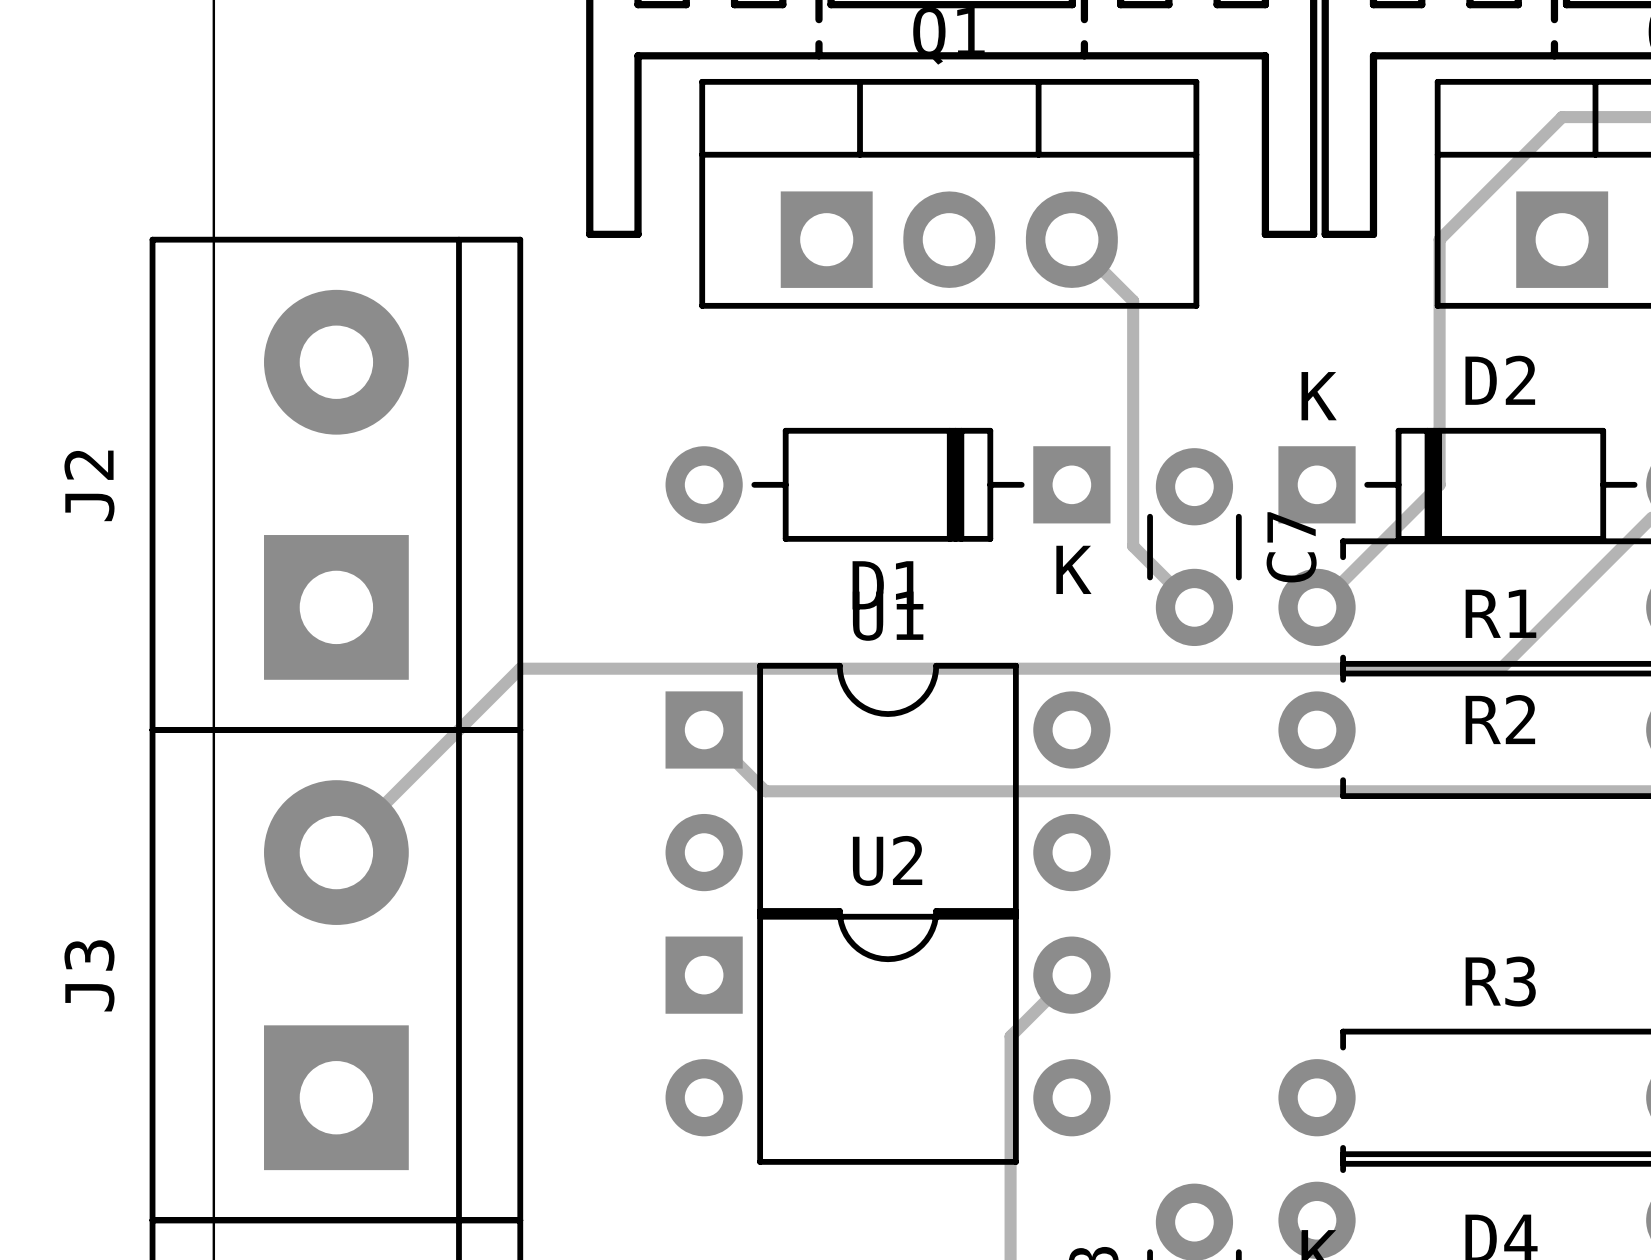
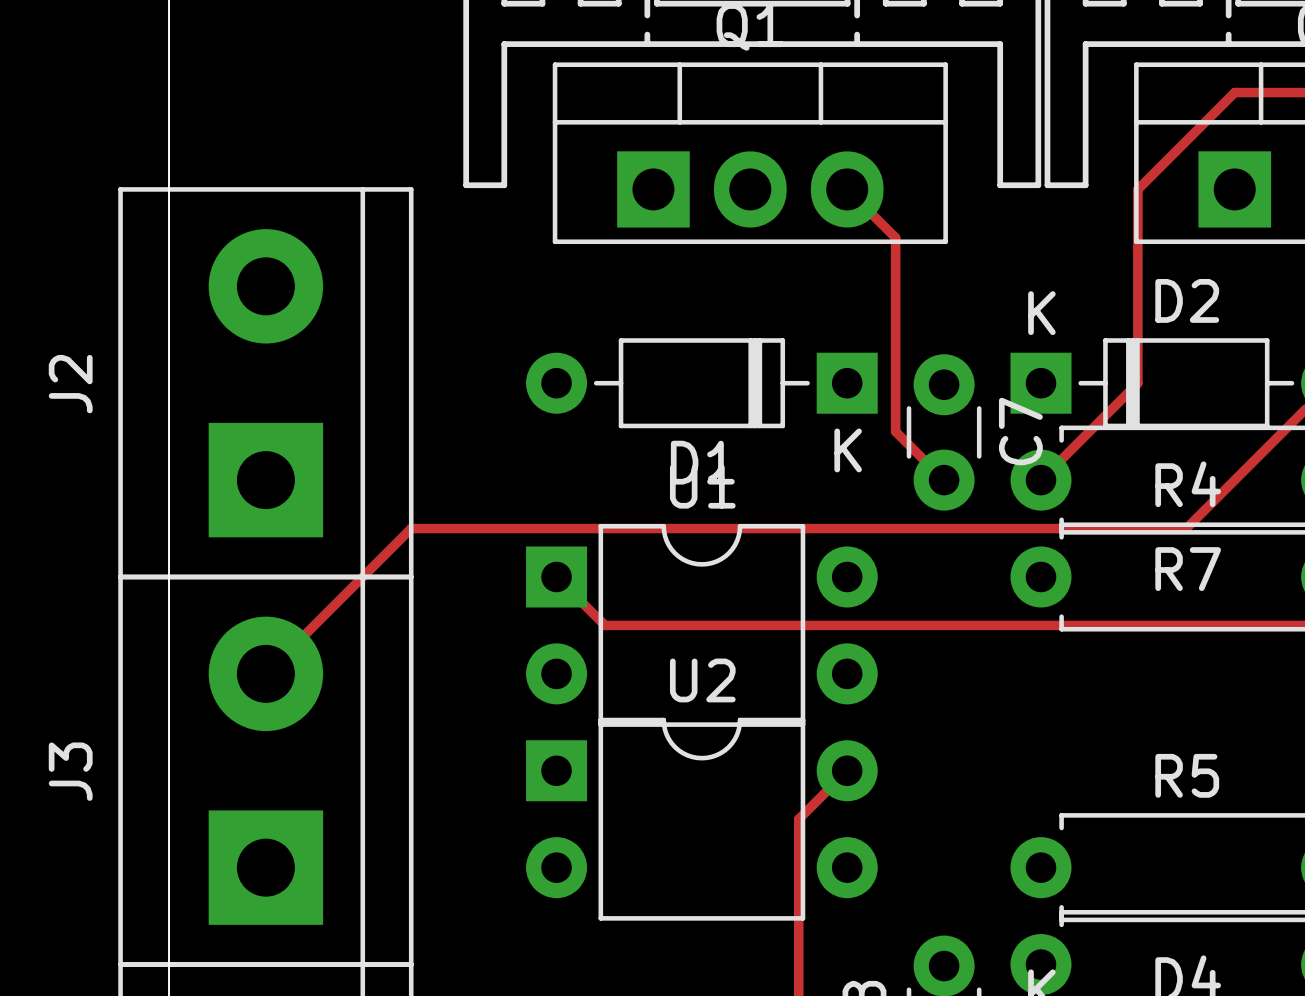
R1 name: R1 (1500, 613) -> R4 (1188, 484)
R2 name: R2 (1500, 719) -> R7 (1188, 569)
R3 name: R3 (1500, 981) -> R5 (1187, 775)

